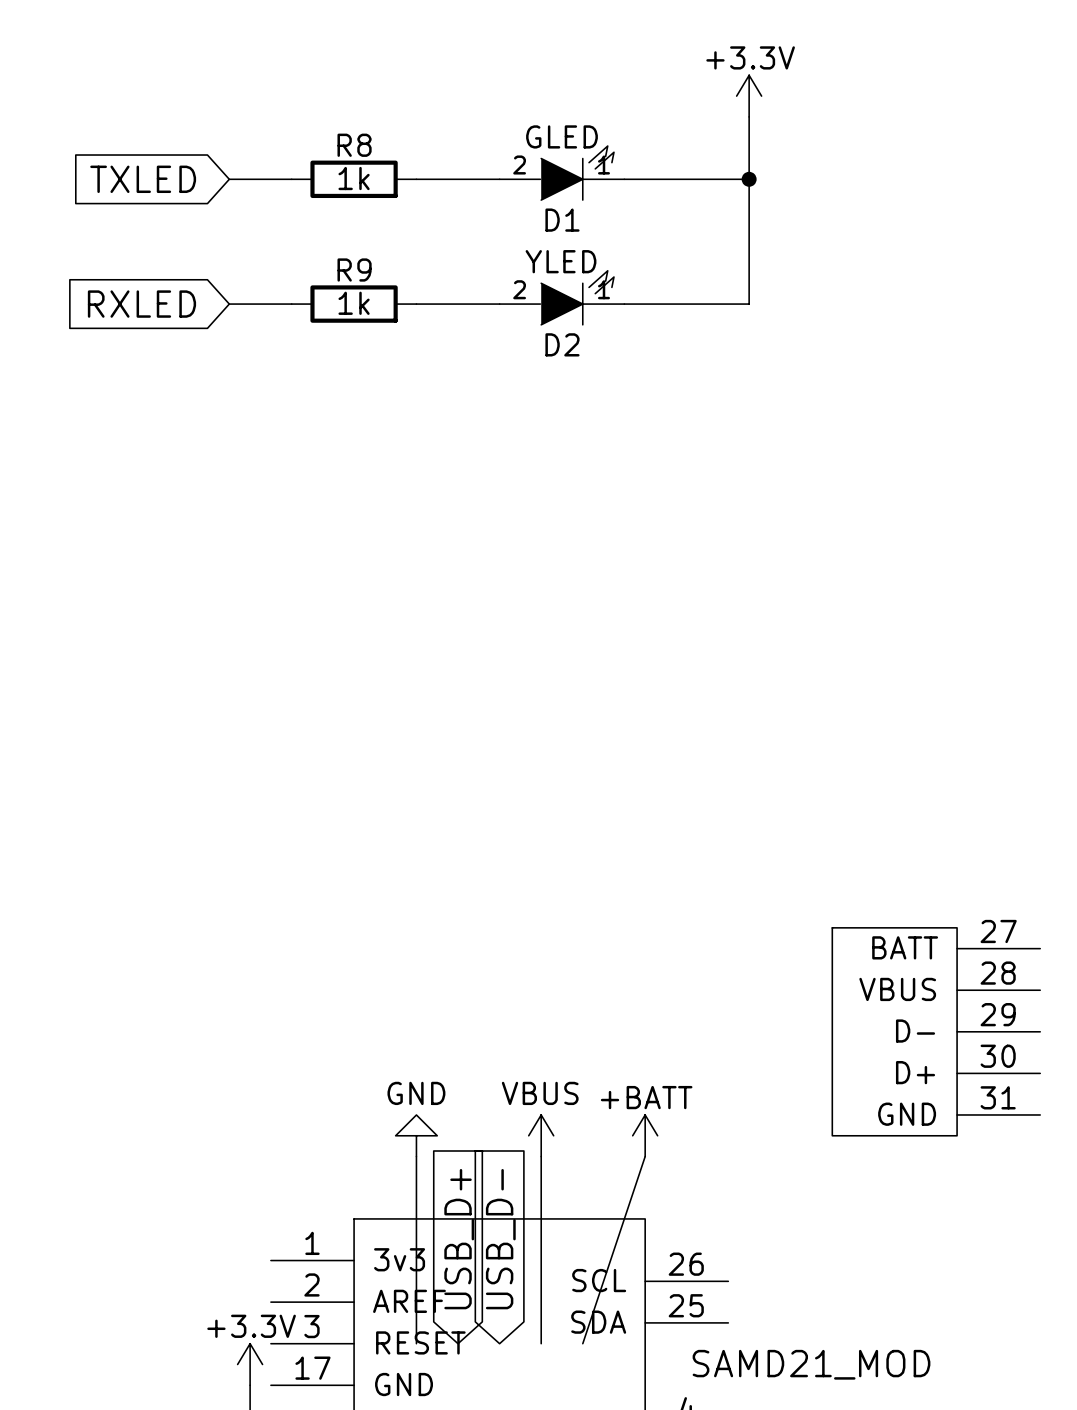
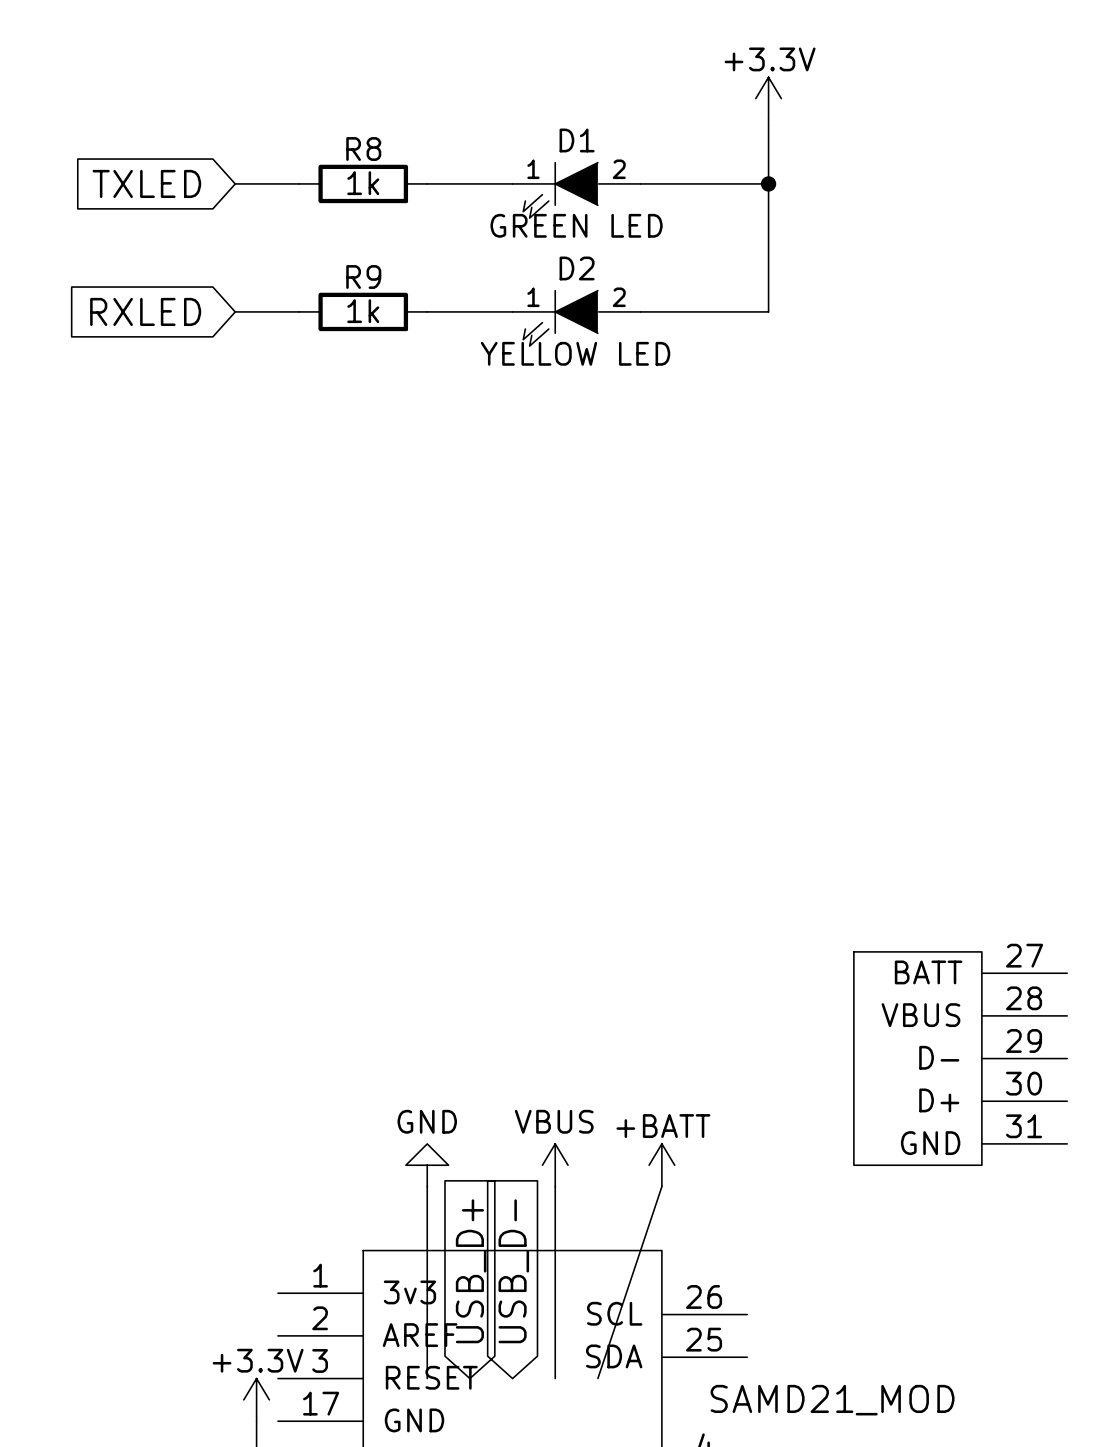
D1 value: GLED (561, 136) -> GREEN LED (576, 225)
D1 rotation: 0° (577, 173) -> 180° (560, 190)
D2 value: YLED (561, 261) -> YELLOW LED (575, 353)
D2 rotation: 0° (577, 297) -> 180° (560, 318)

